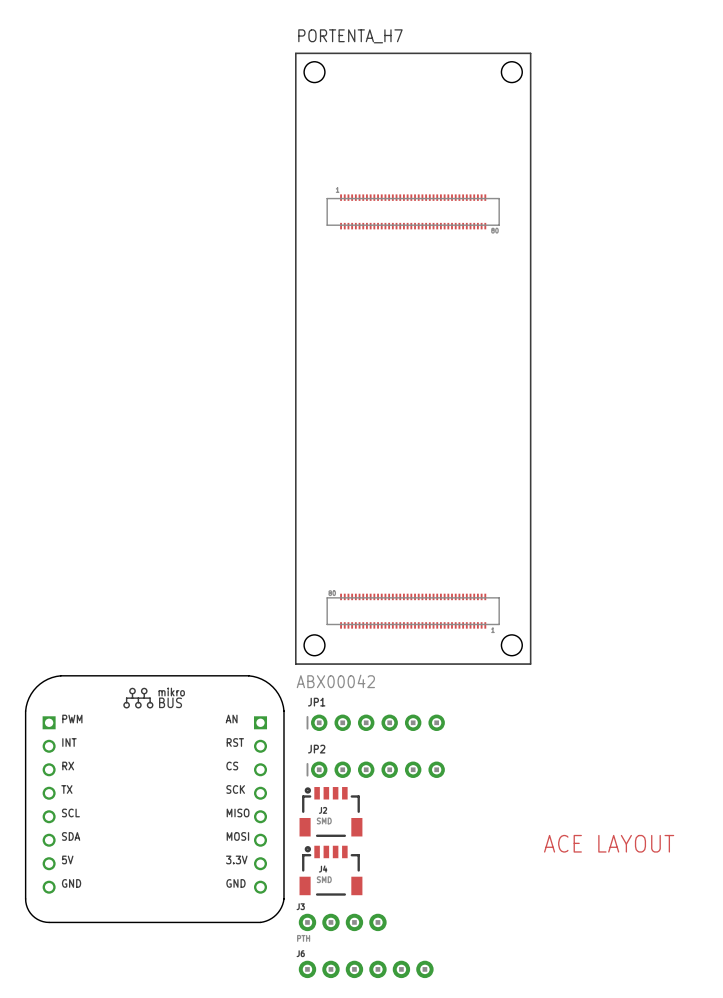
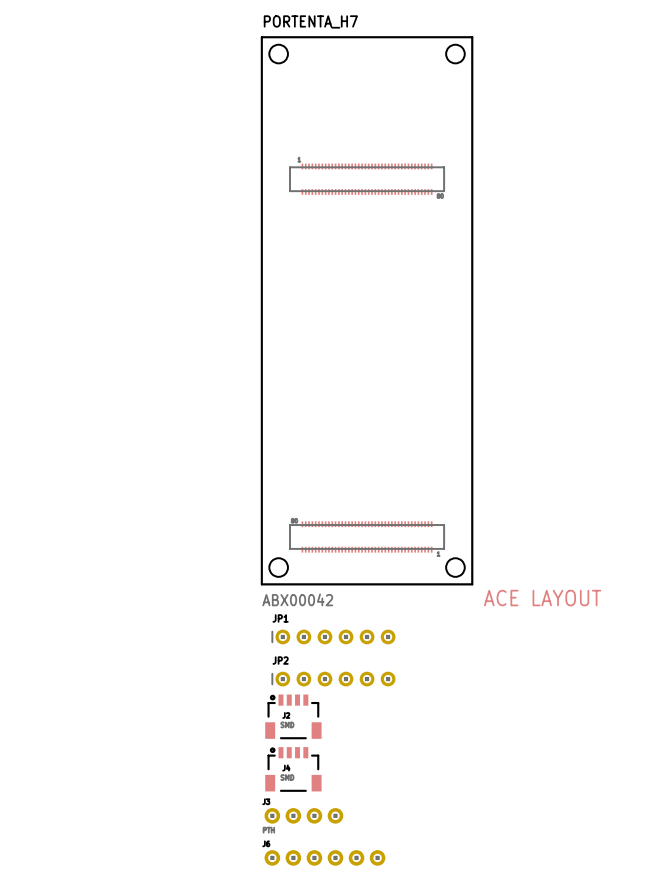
part: (154, 799) -> none
text position: ACE LAYOUT (609, 843) -> ACE LAYOUT (542, 598)

